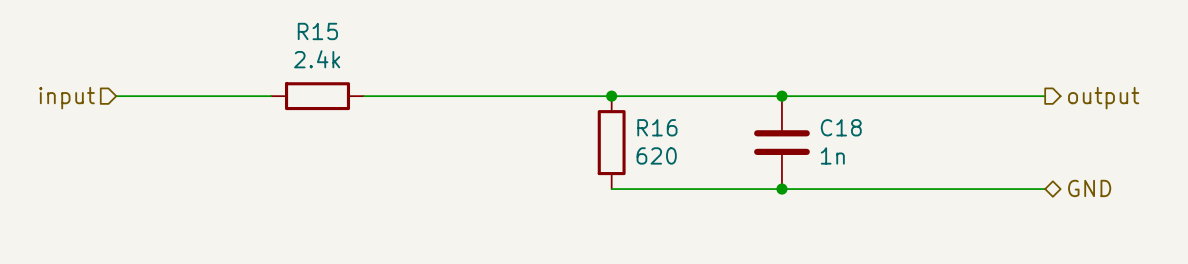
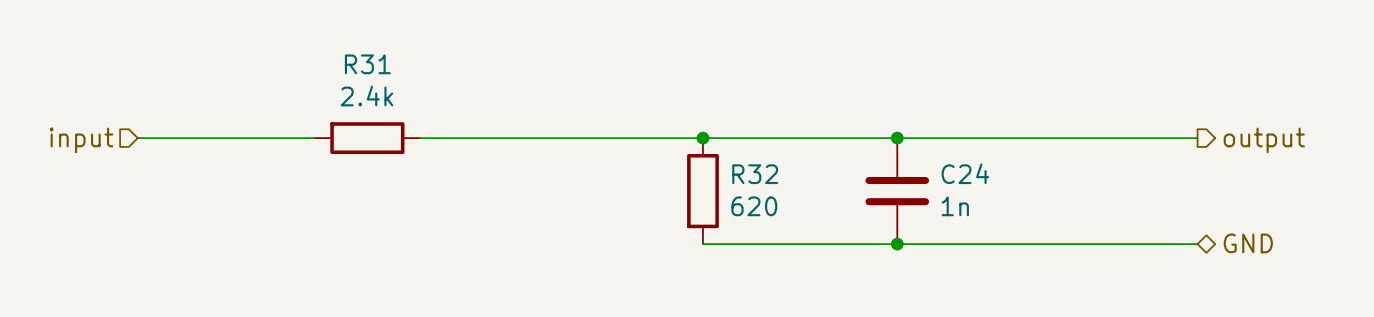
R15 name: R15 (317, 31) -> R31 (367, 64)
R16 name: R16 (657, 127) -> R32 (755, 174)
C18 name: C18 (841, 127) -> C24 (965, 173)

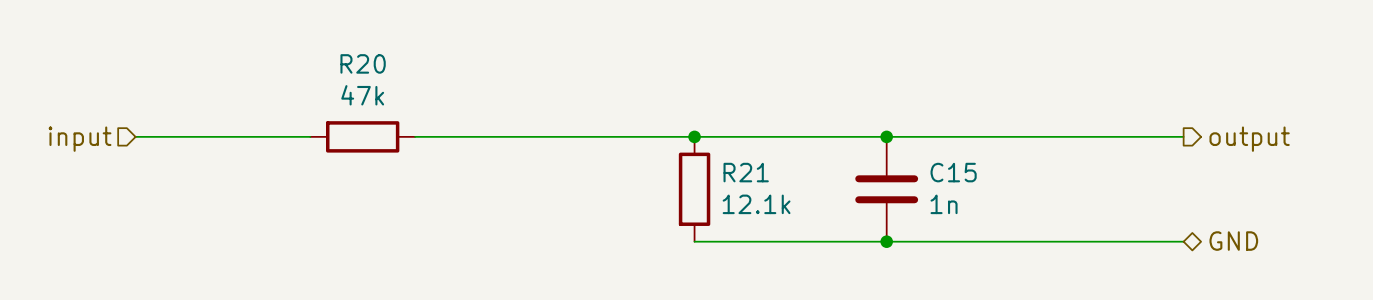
R31 name: R31 (367, 64) -> R20 (363, 63)
R31 value: 2.4k (366, 96) -> 47k (362, 95)
C24 name: C24 (965, 173) -> C15 (953, 172)
R32 name: R32 (755, 174) -> R21 (746, 172)
R32 value: 620 (754, 206) -> 12.1k (756, 204)

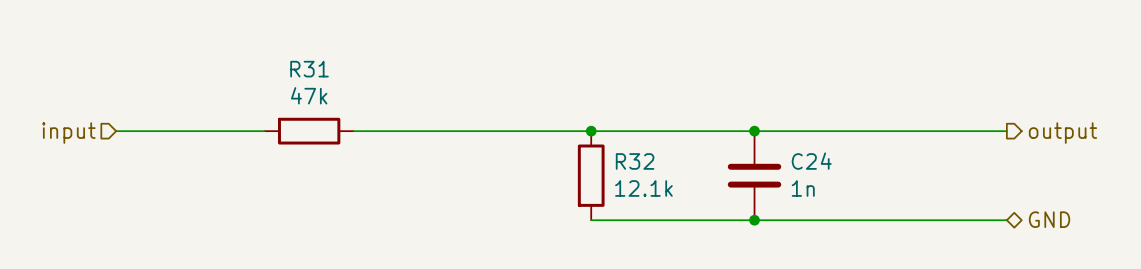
R20 name: R20 (363, 63) -> R31 (309, 69)
R21 name: R21 (746, 172) -> R32 (635, 161)
C15 name: C15 (953, 172) -> C24 (811, 161)

